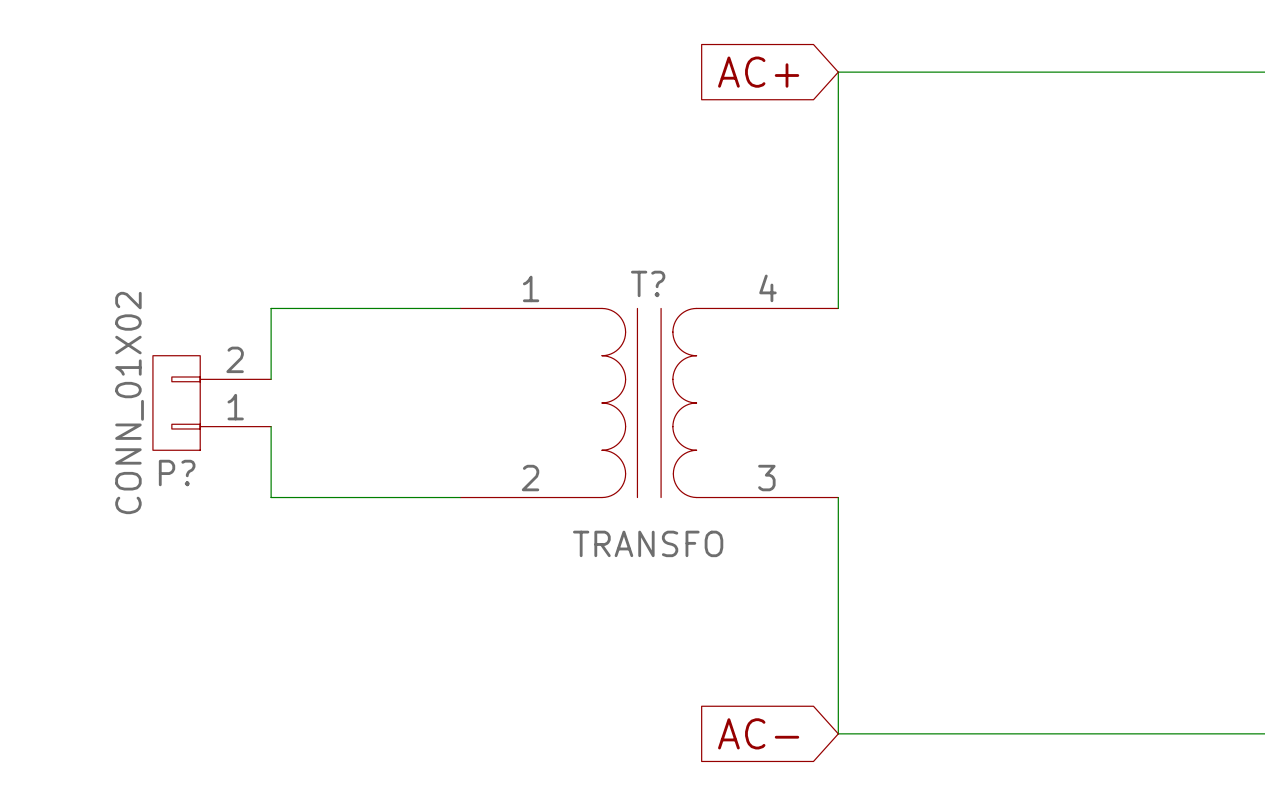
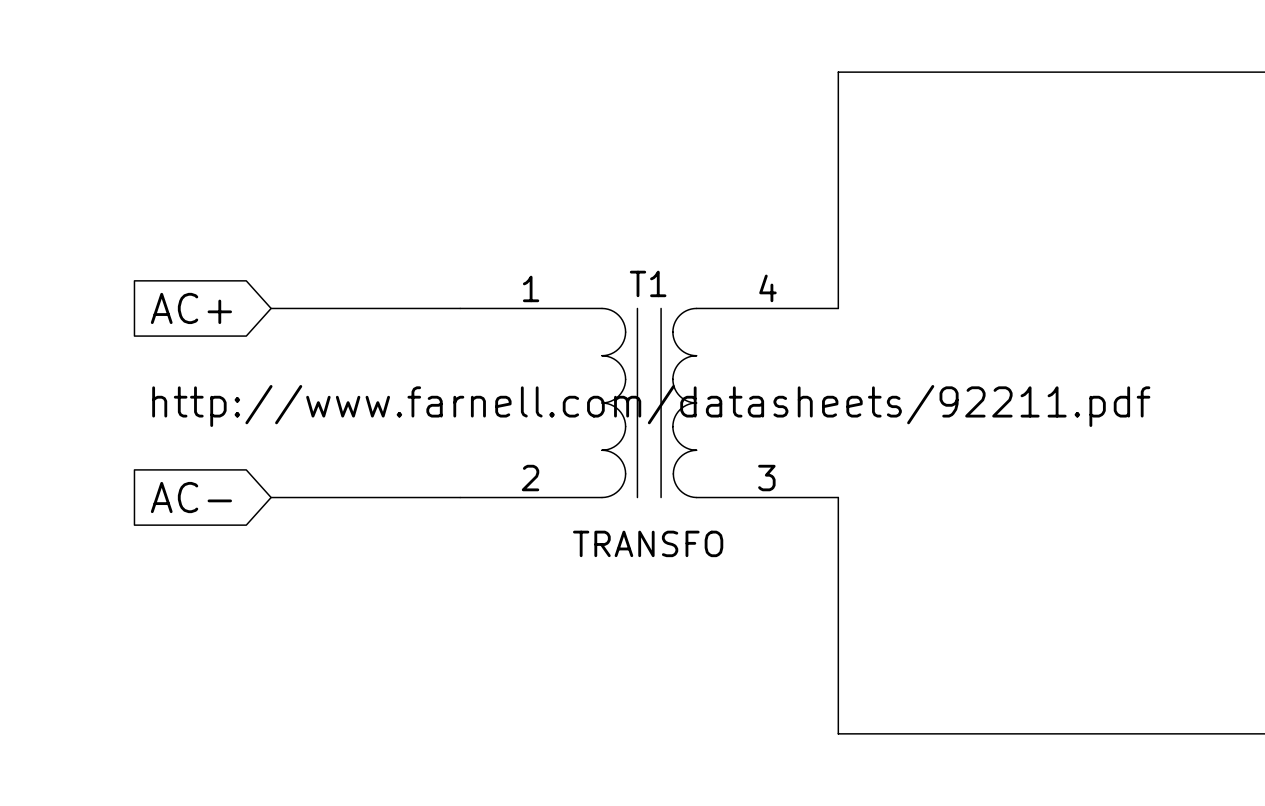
global label: AC+ (758, 72) -> none
T? name: T? (648, 283) -> T1 (648, 283)
global label: none -> AC+ (191, 308)
wire: (271, 308) (271, 379) -> none
P?: CONN_01X02 (212, 402) -> none
T? text: none -> http://www.farnell.com/datasheets/92211.pdf (651, 405)
wire: (271, 426) (271, 497) -> none
global label: none -> AC- (191, 497)
global label: AC- (758, 733) -> none

